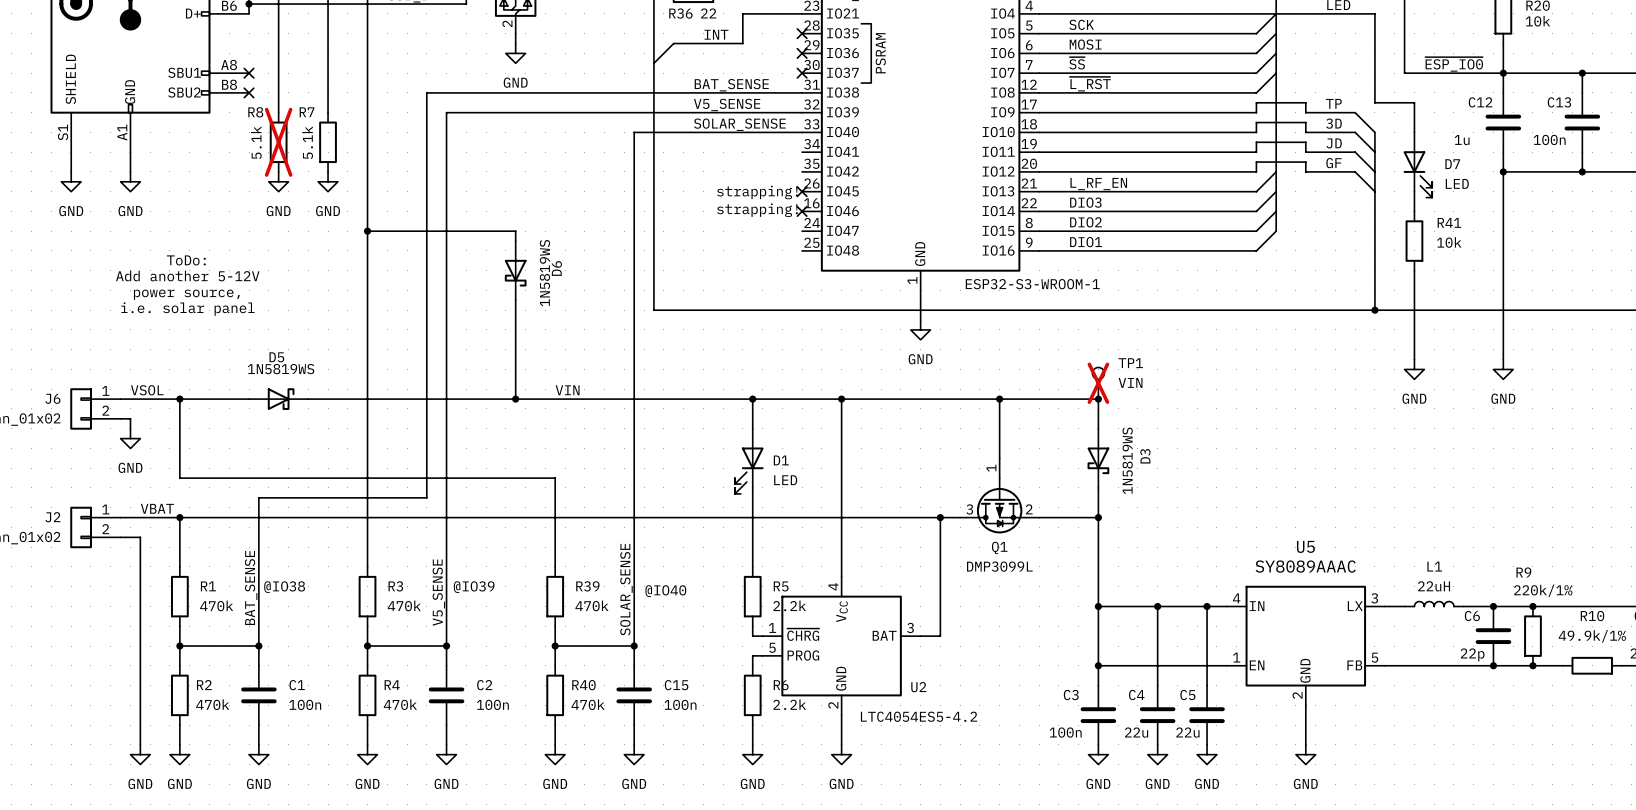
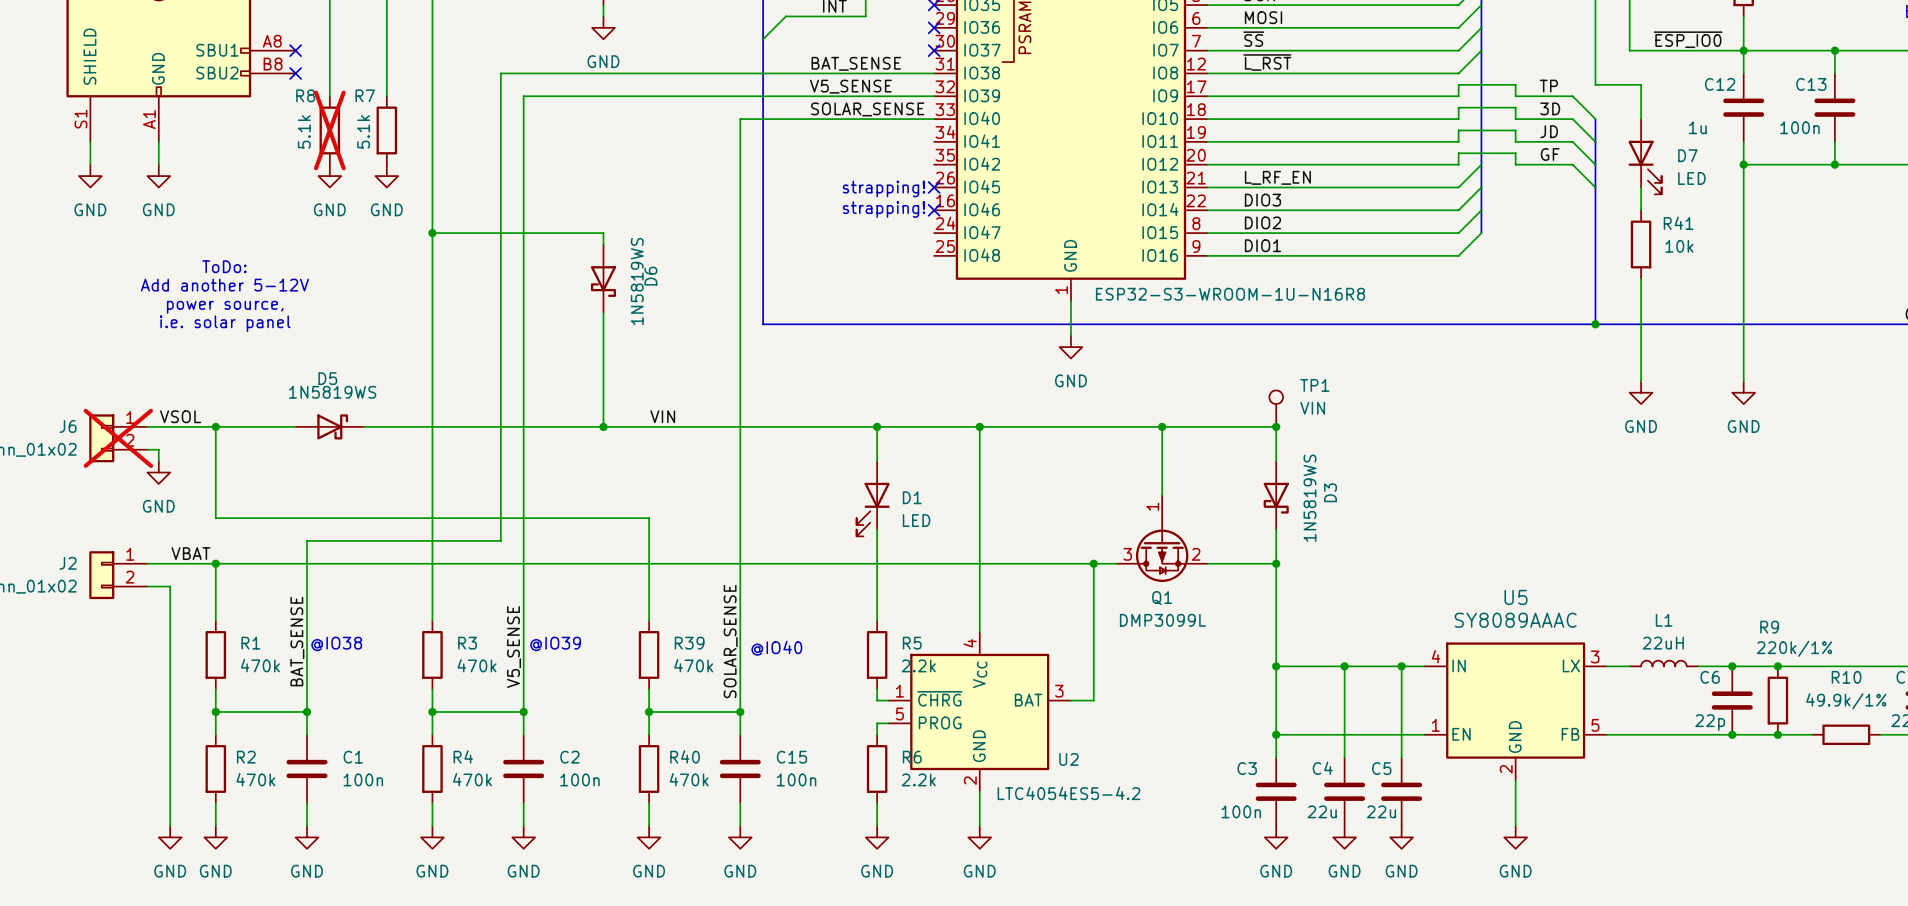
part value: ESP32-S3-WROOM-1 (1032, 284) -> ESP32-S3-WROOM-1U-N16R8 (1230, 294)
TP1 do-not-place cross: (1098, 383) -> none
J6 do-not-place cross: none -> (118, 438)

